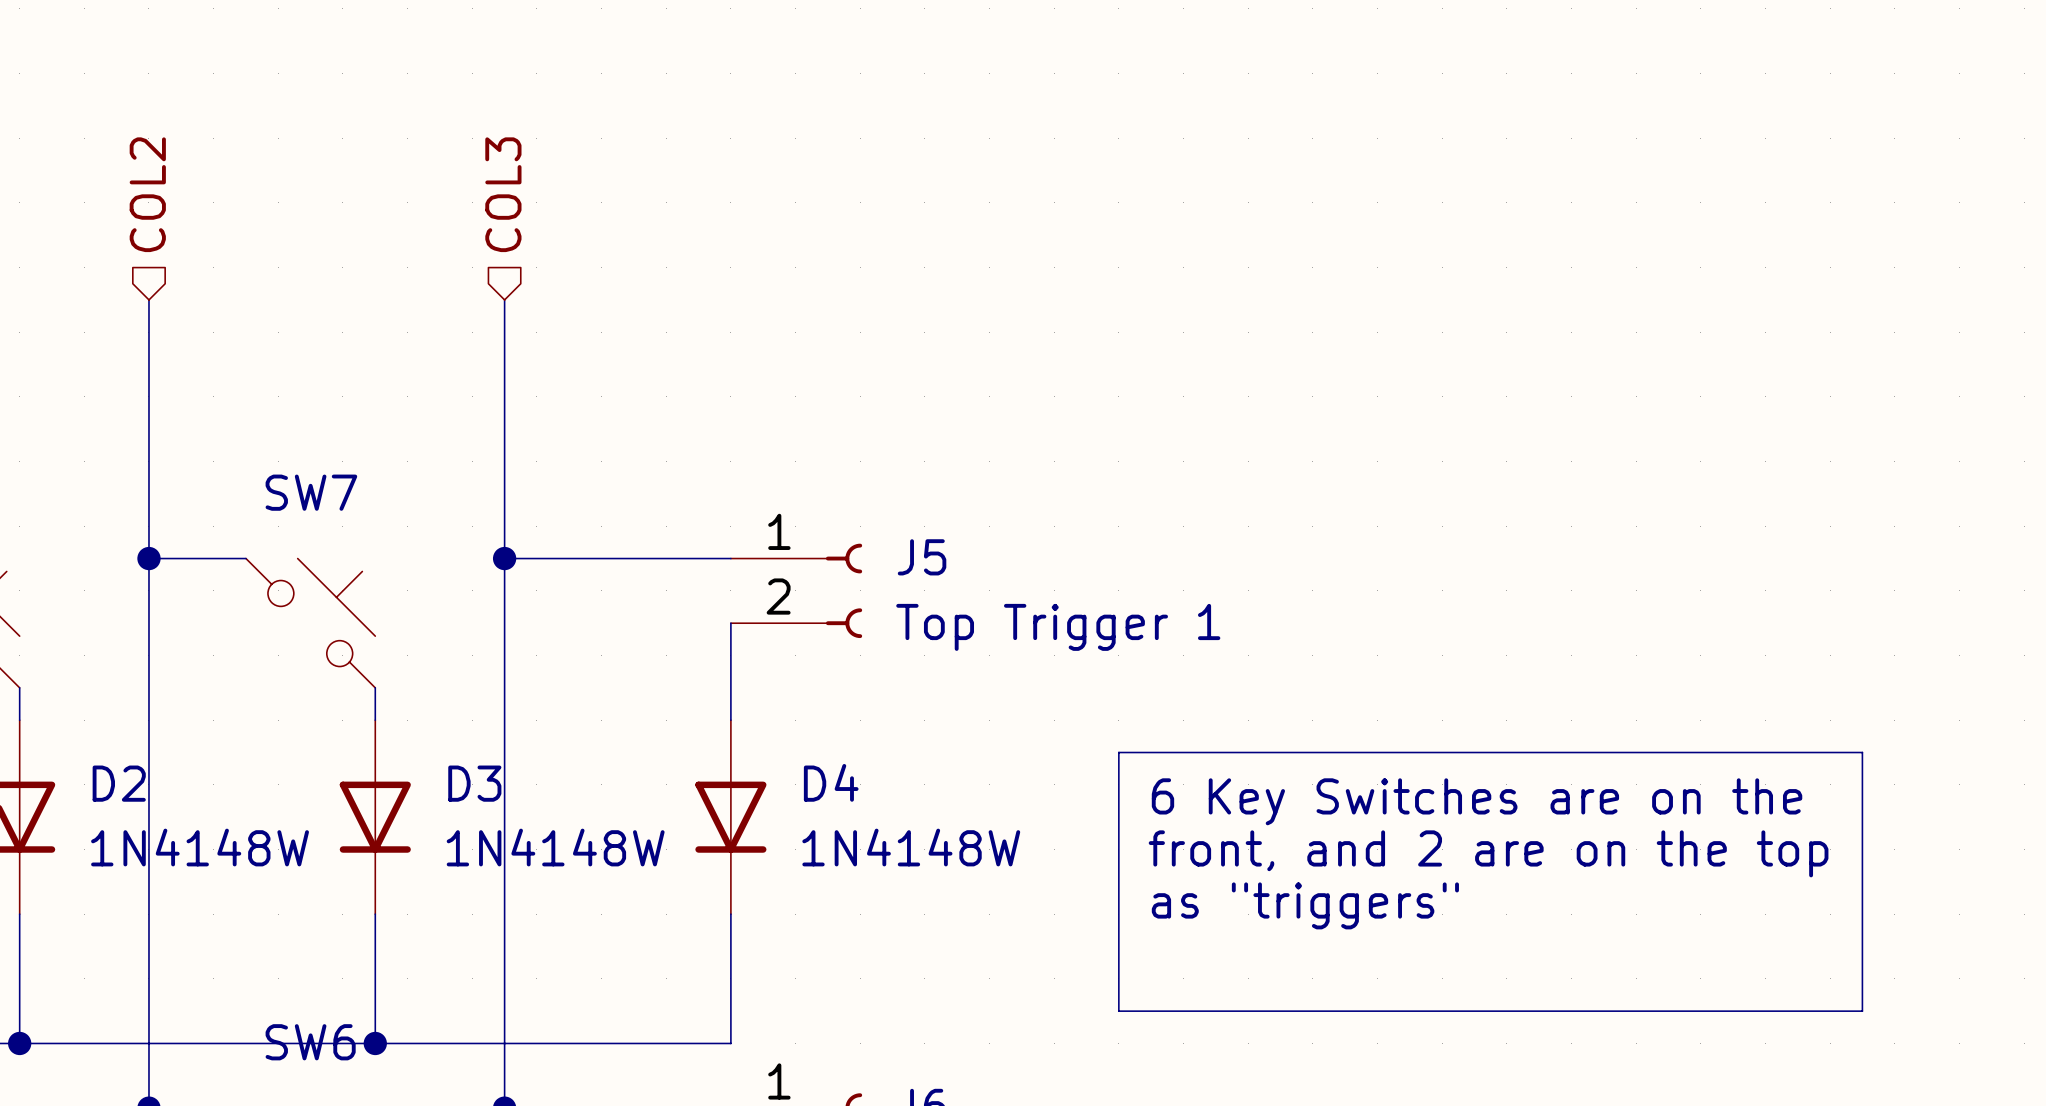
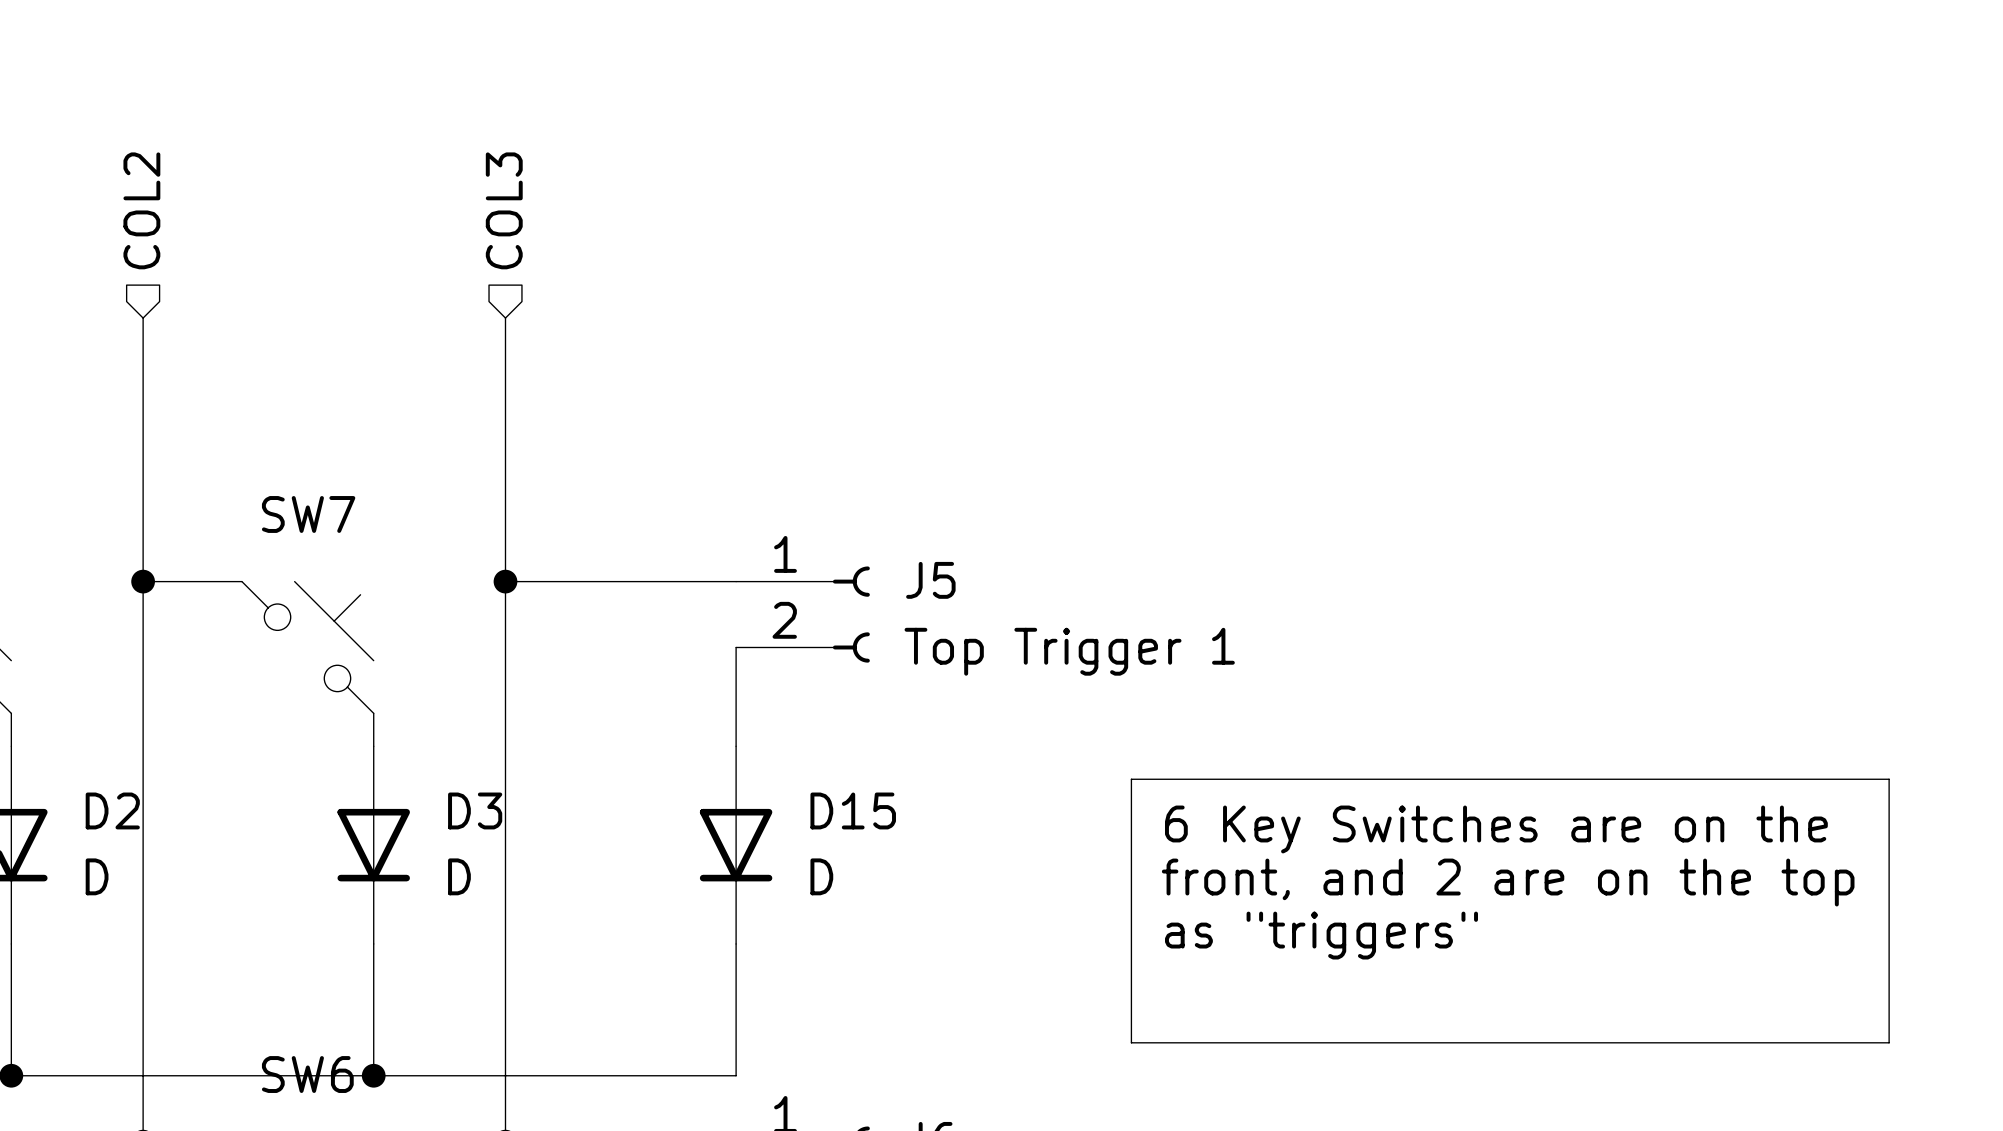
D4 name: D4 (831, 782) -> D15 (853, 810)
D2 value: 1N4148W (200, 847) -> D (97, 876)
D3 value: 1N4148W (555, 847) -> D (459, 876)
D4 value: 1N4148W (911, 847) -> D (821, 876)

